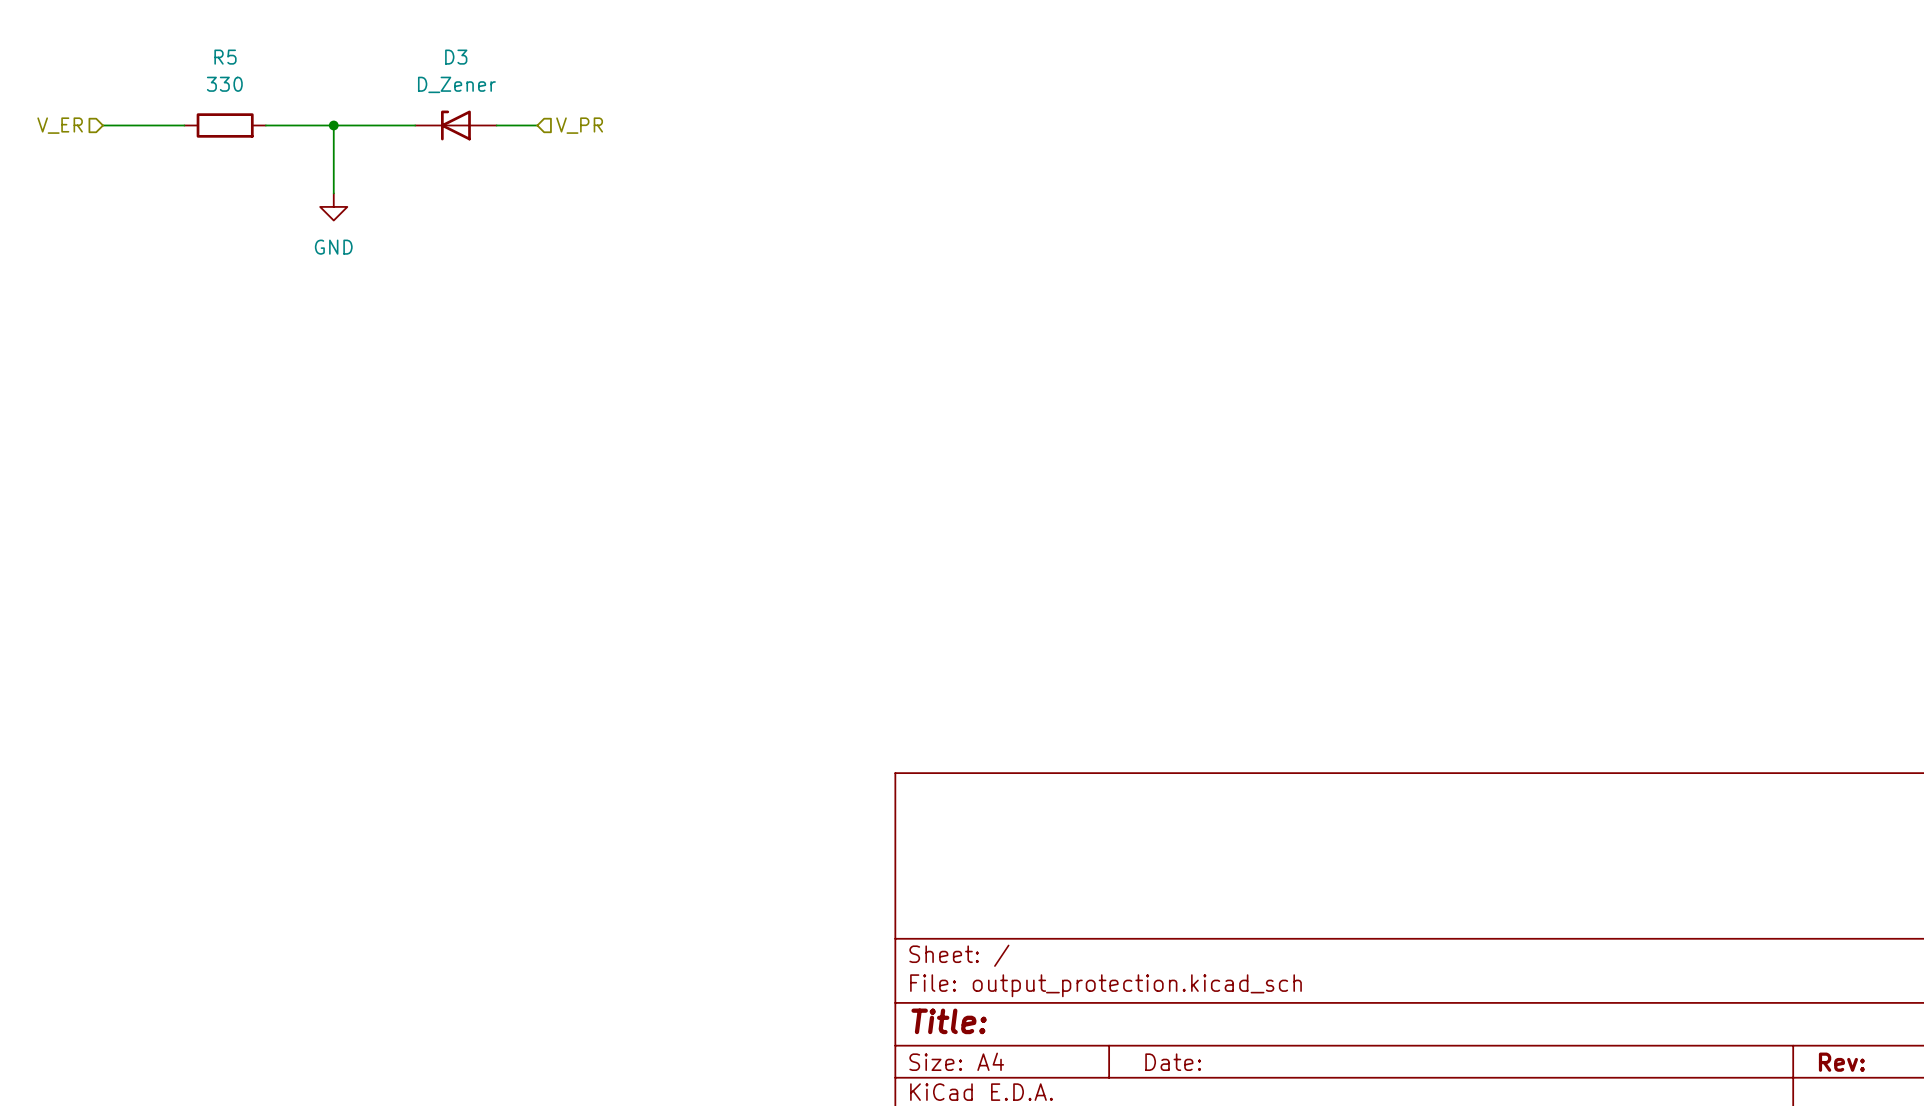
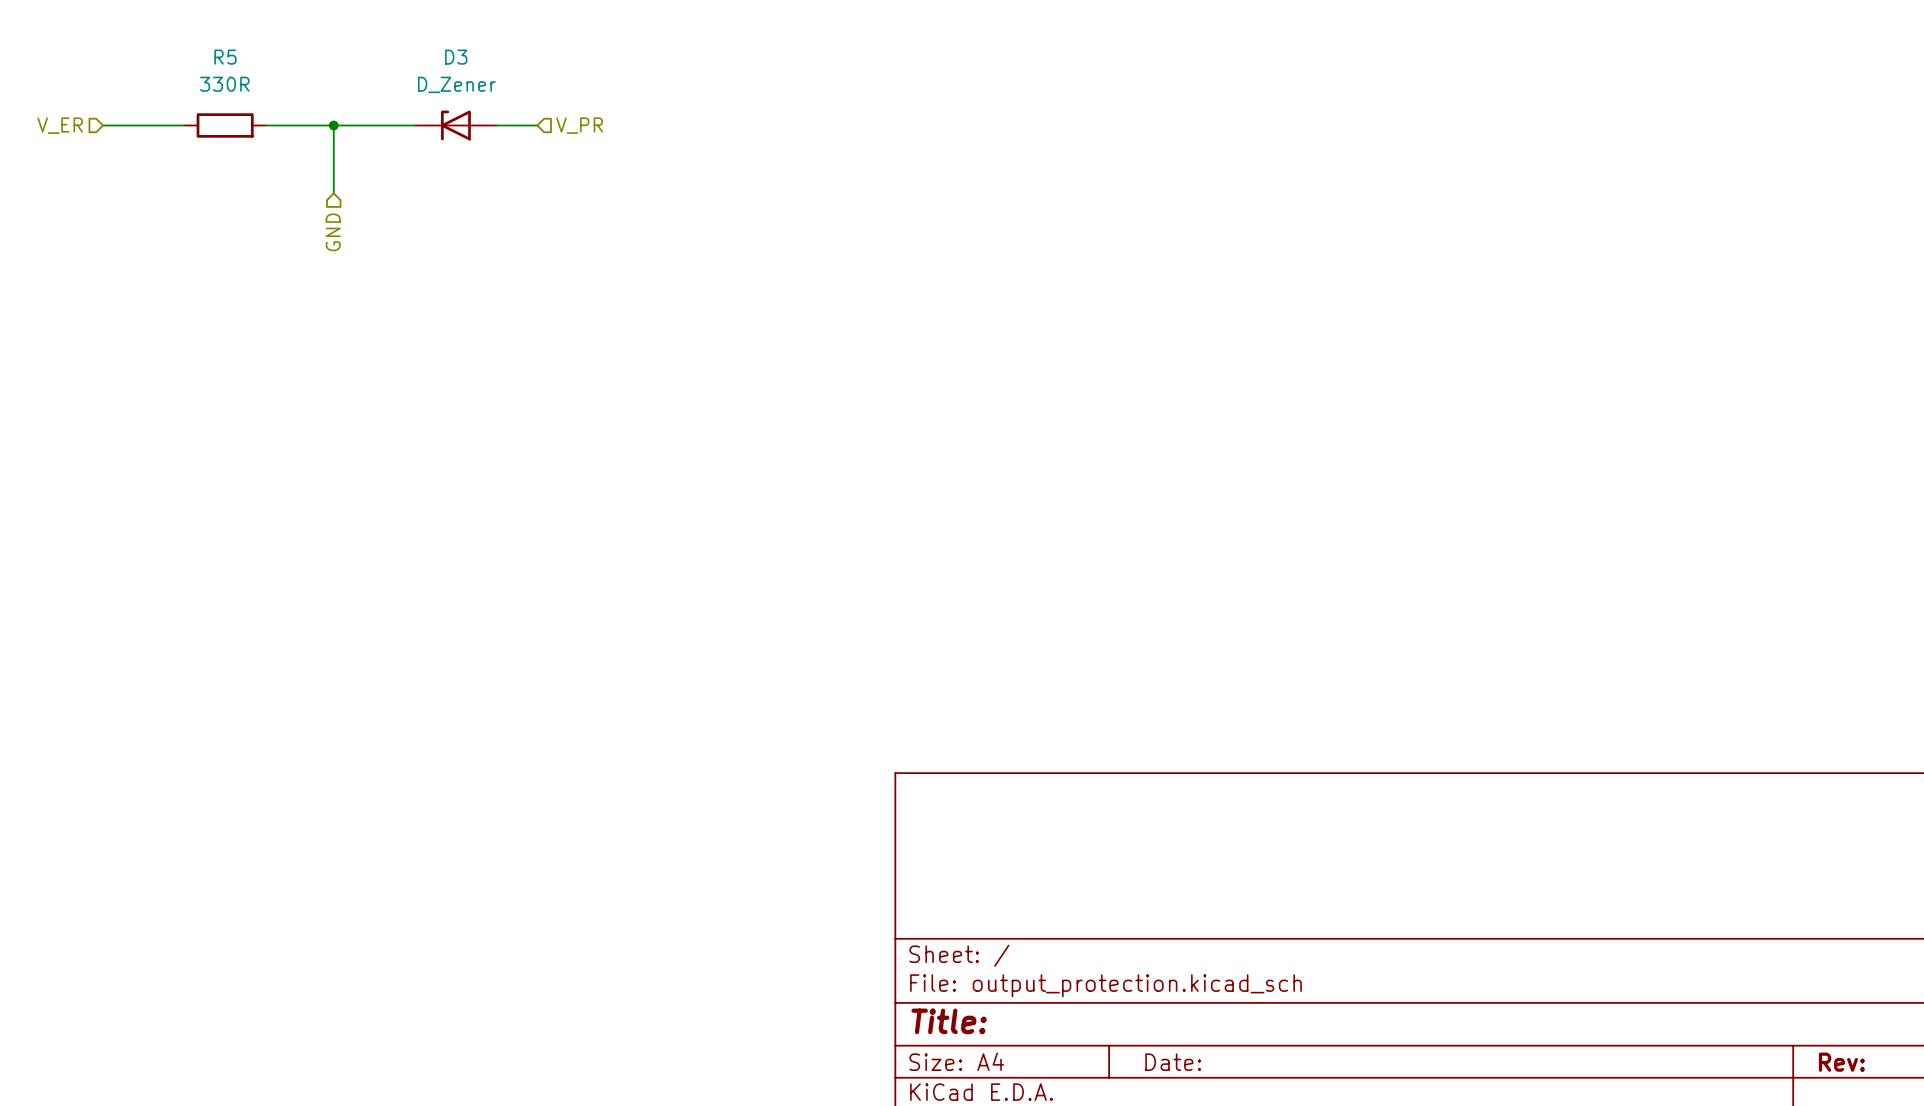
R5 value: 330 (224, 84) -> 330R (224, 84)
power symbol: GND (333, 206) -> none
hierarchical label: none -> GND (333, 232)

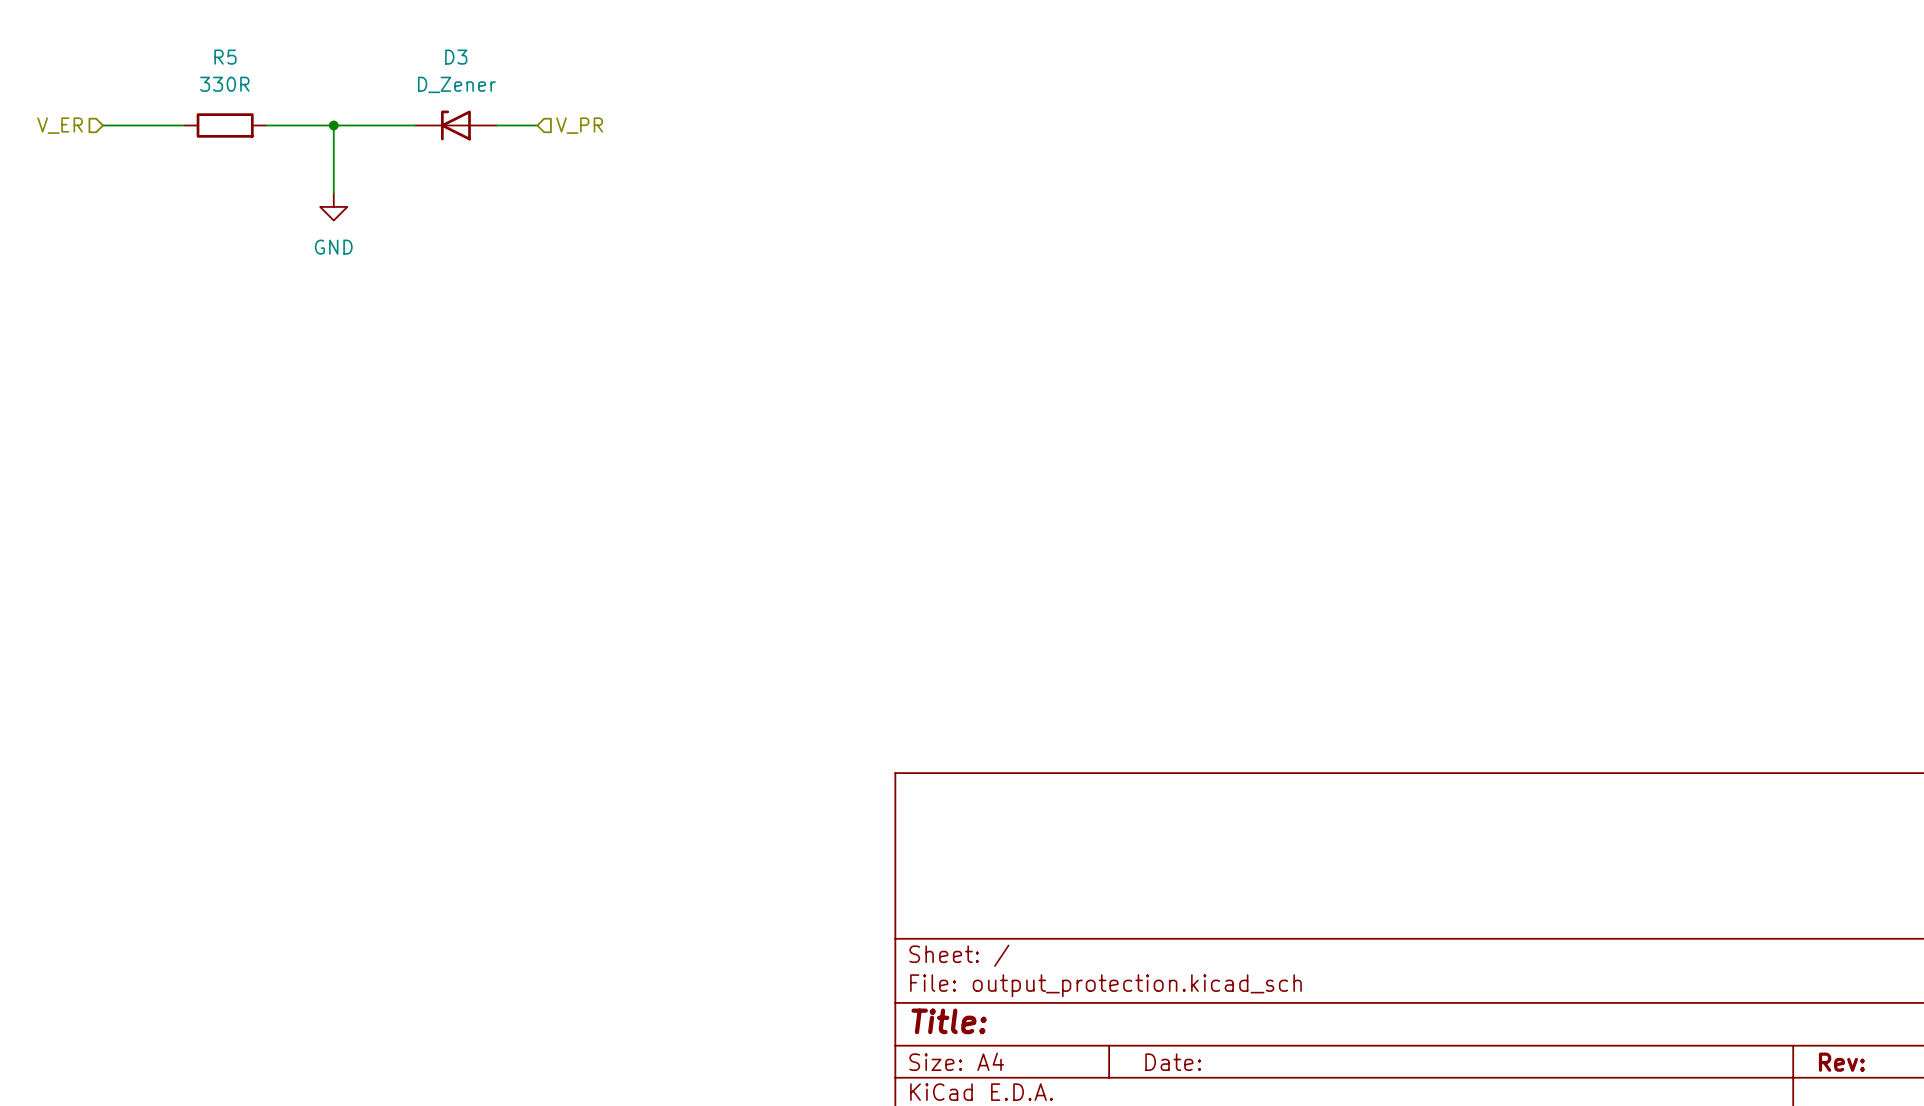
power symbol: none -> GND (333, 206)
hierarchical label: GND (333, 232) -> none

